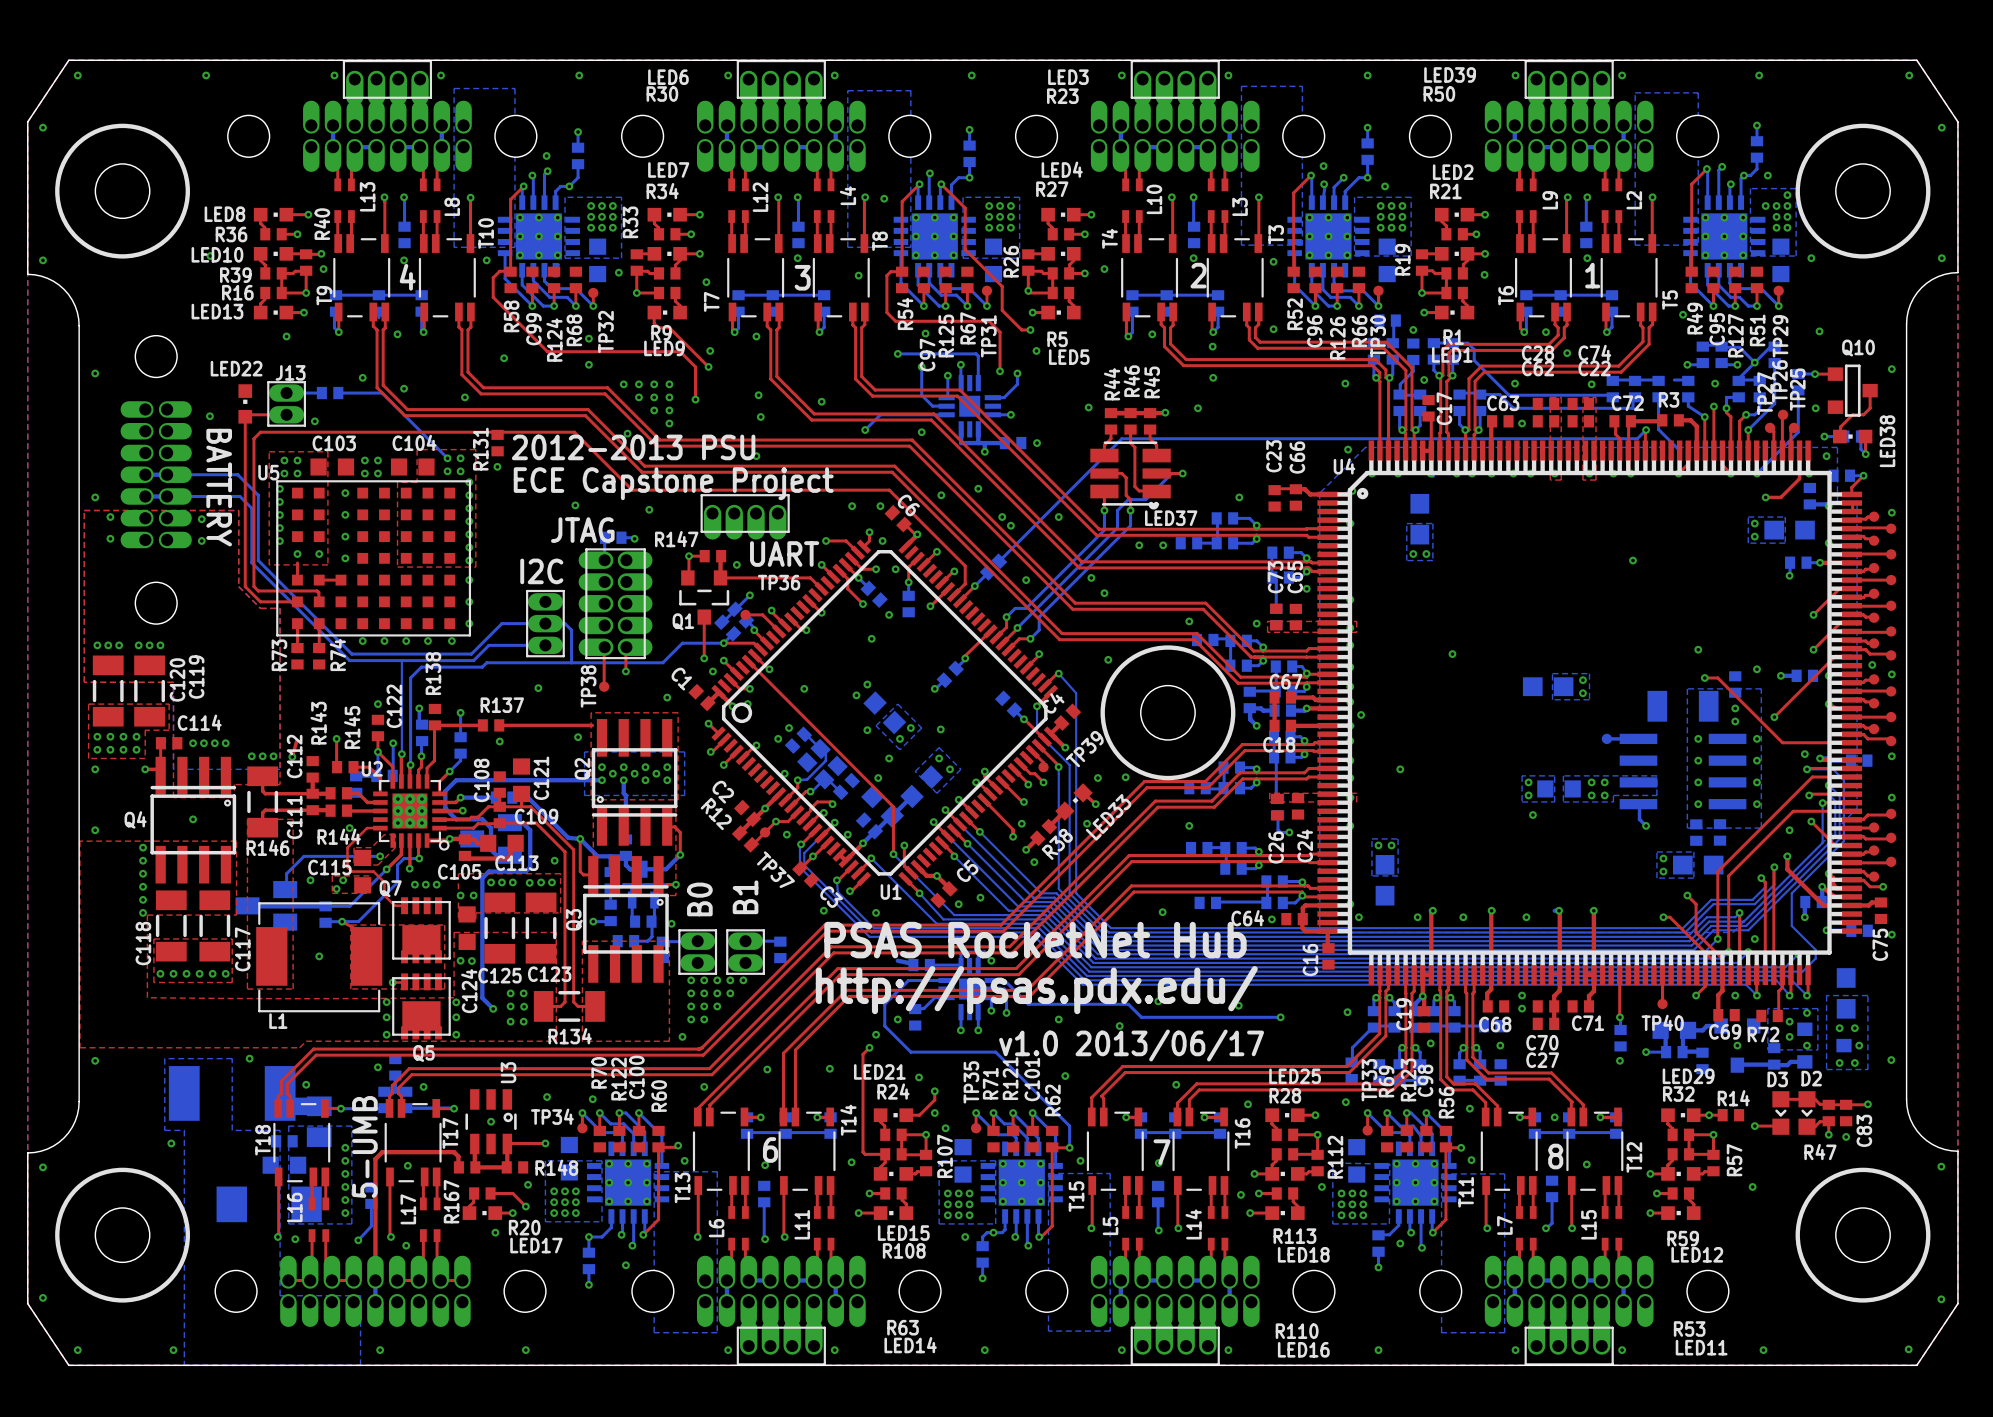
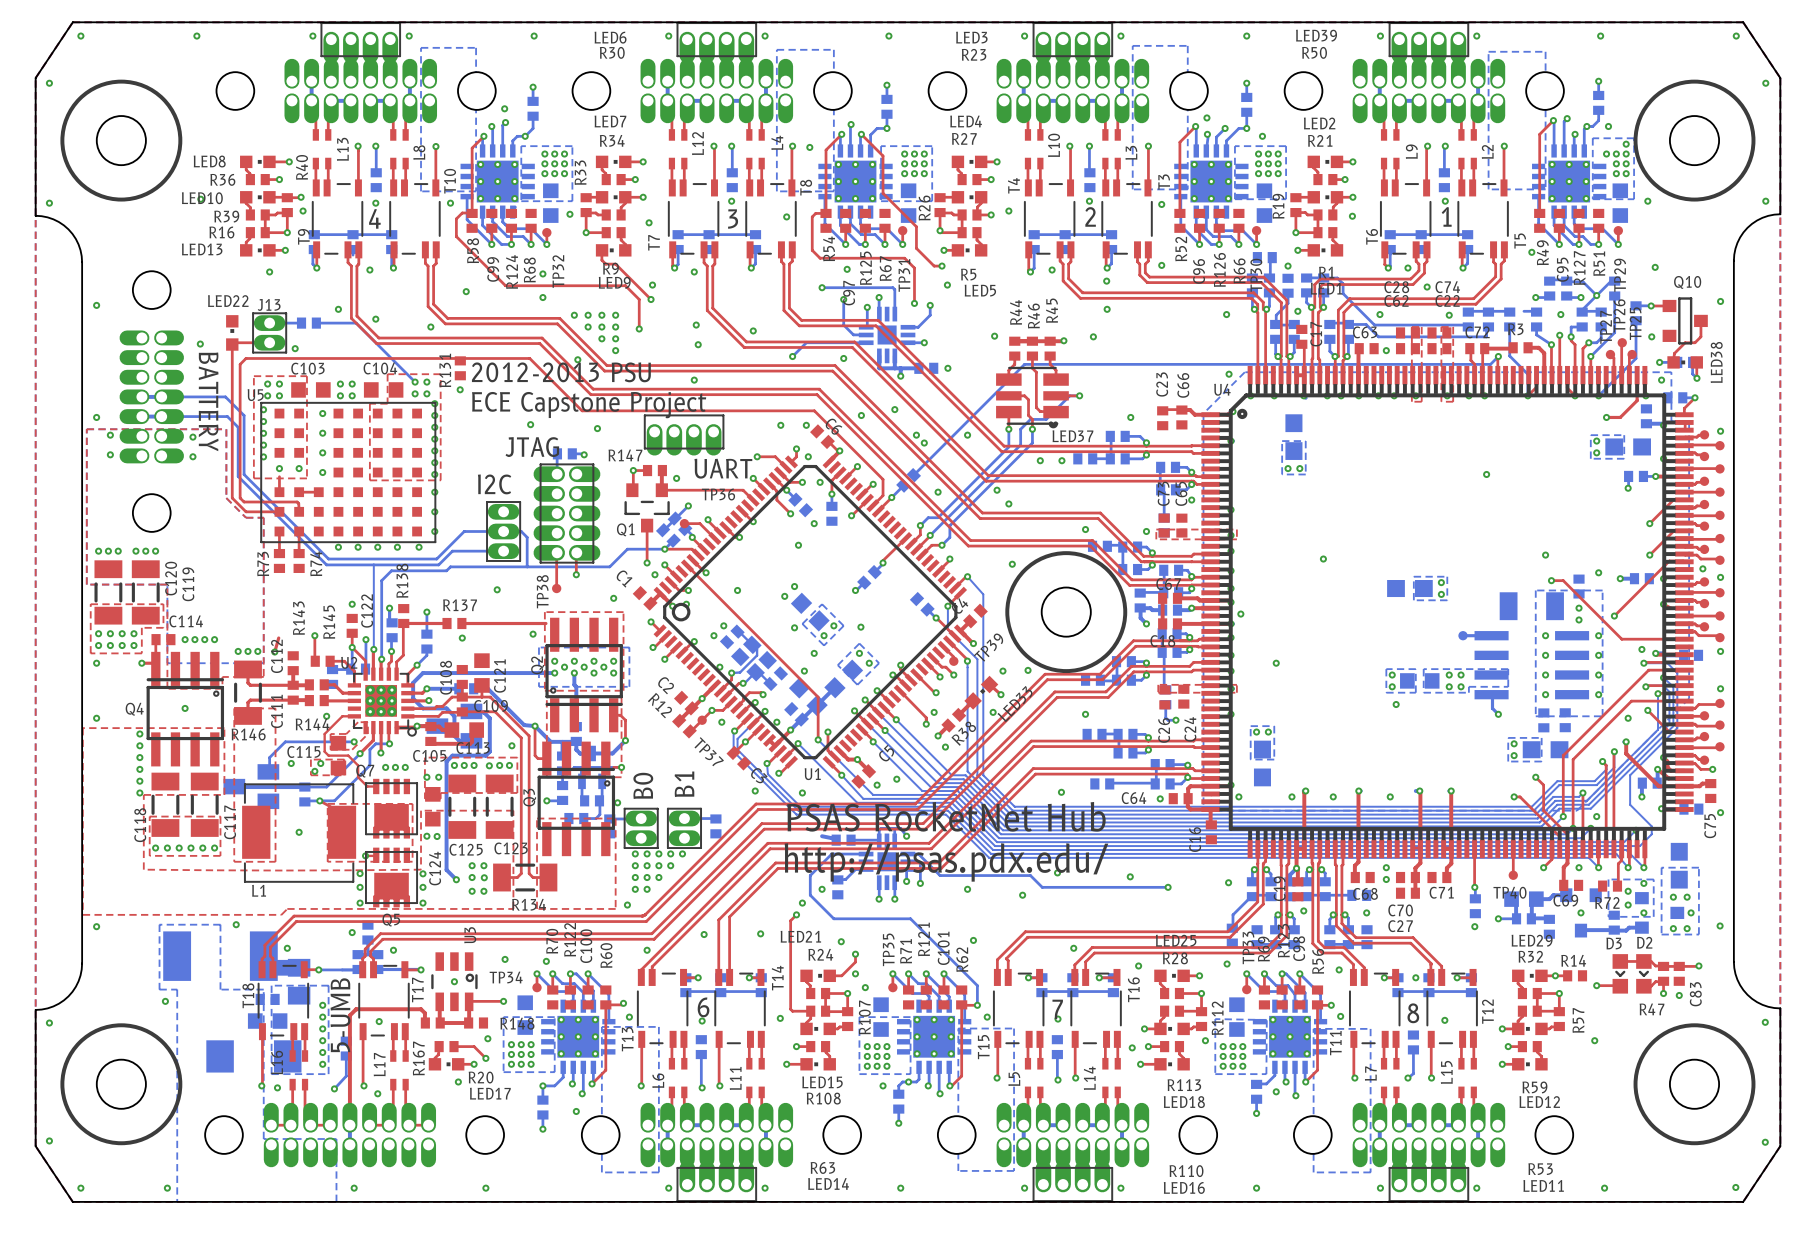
text: v1.0 2013/06/17 (1131, 1045) -> none

